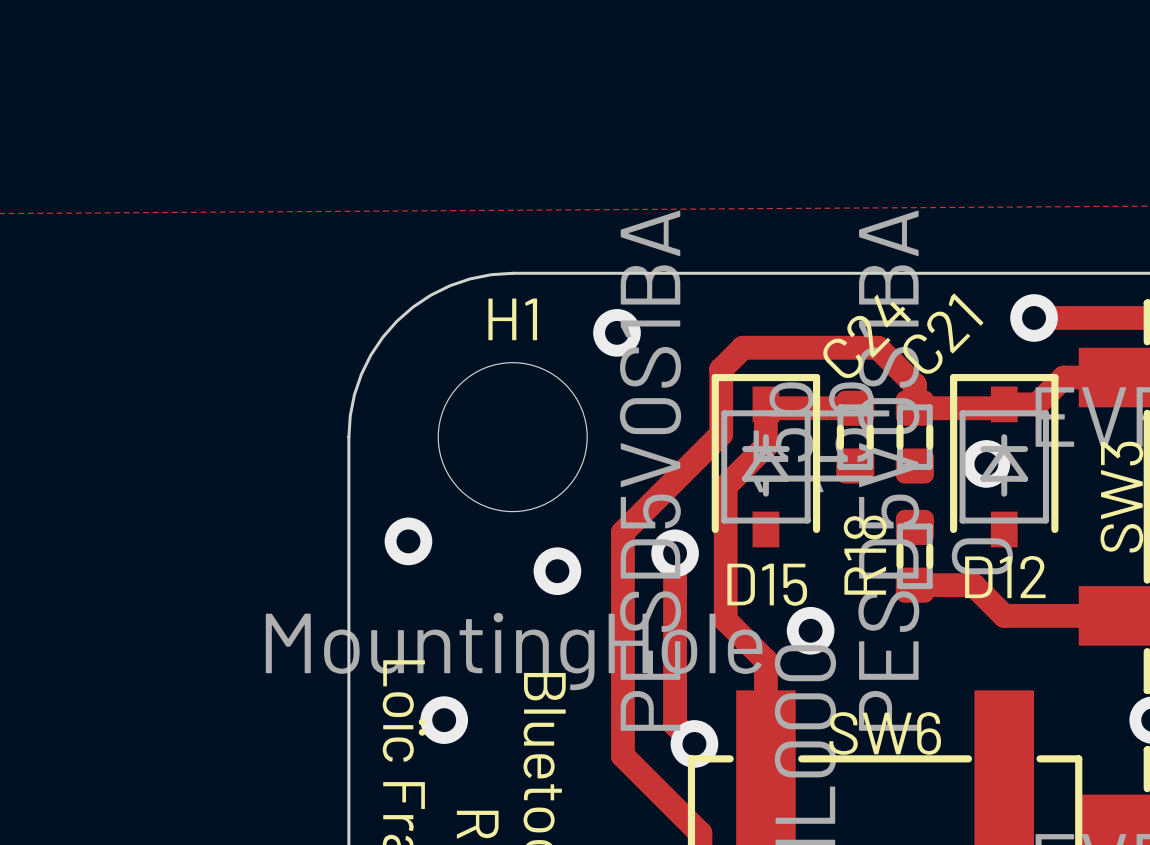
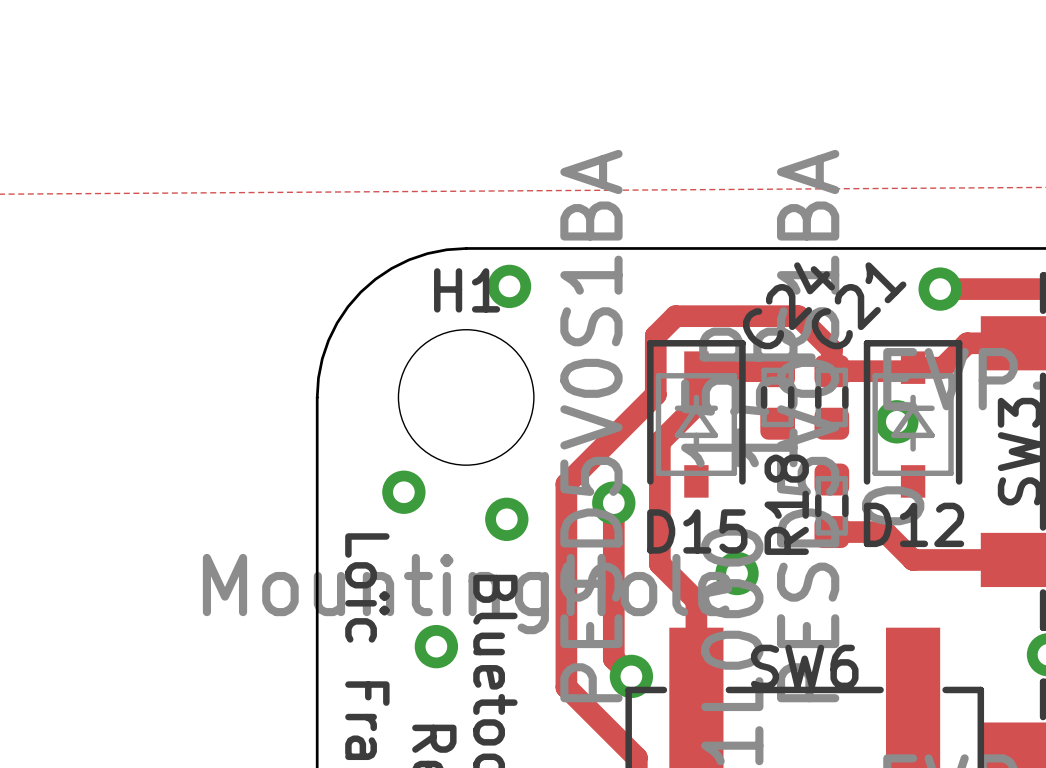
via position: (616, 332) -> (509, 286)
via position: (408, 541) -> (403, 492)
via position: (444, 720) -> (436, 646)

